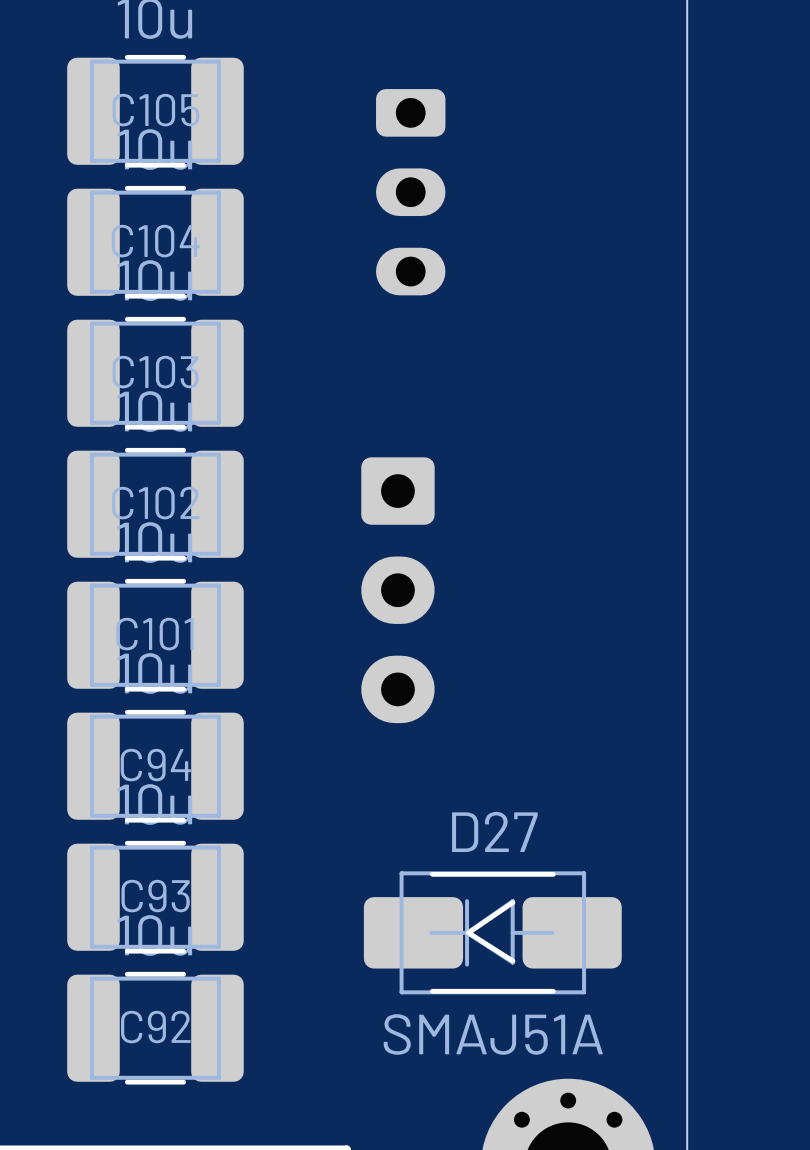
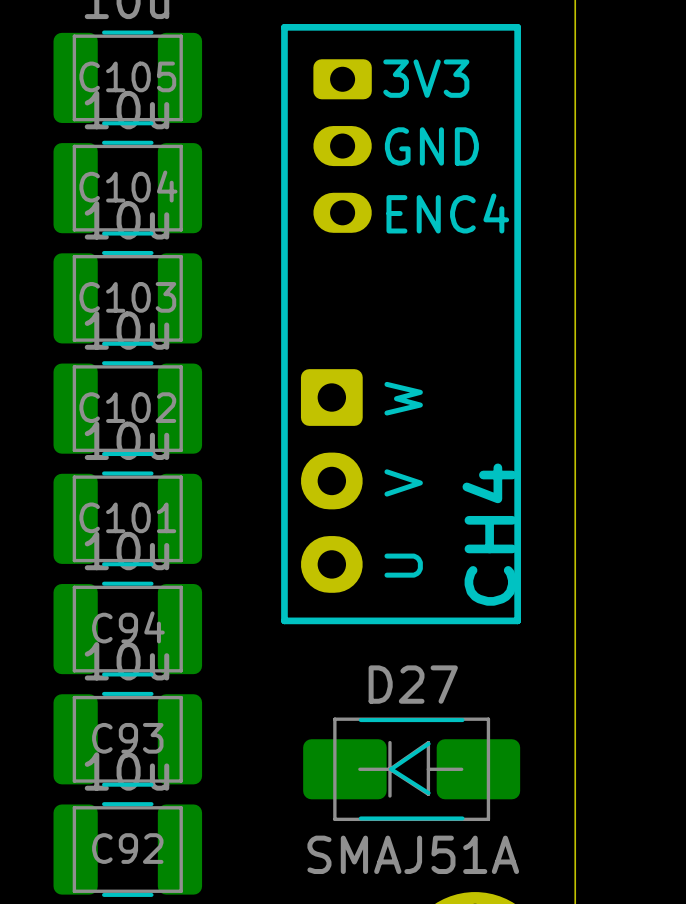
line: none -> (517, 27) (284, 27) (284, 620) (517, 620) (517, 27)
text: none -> 3V3 (426, 78)
text: none -> GND (431, 146)
text: none -> ENC4 (447, 213)
text: none -> U V W (403, 479)
text: none -> CH4 (489, 534)

